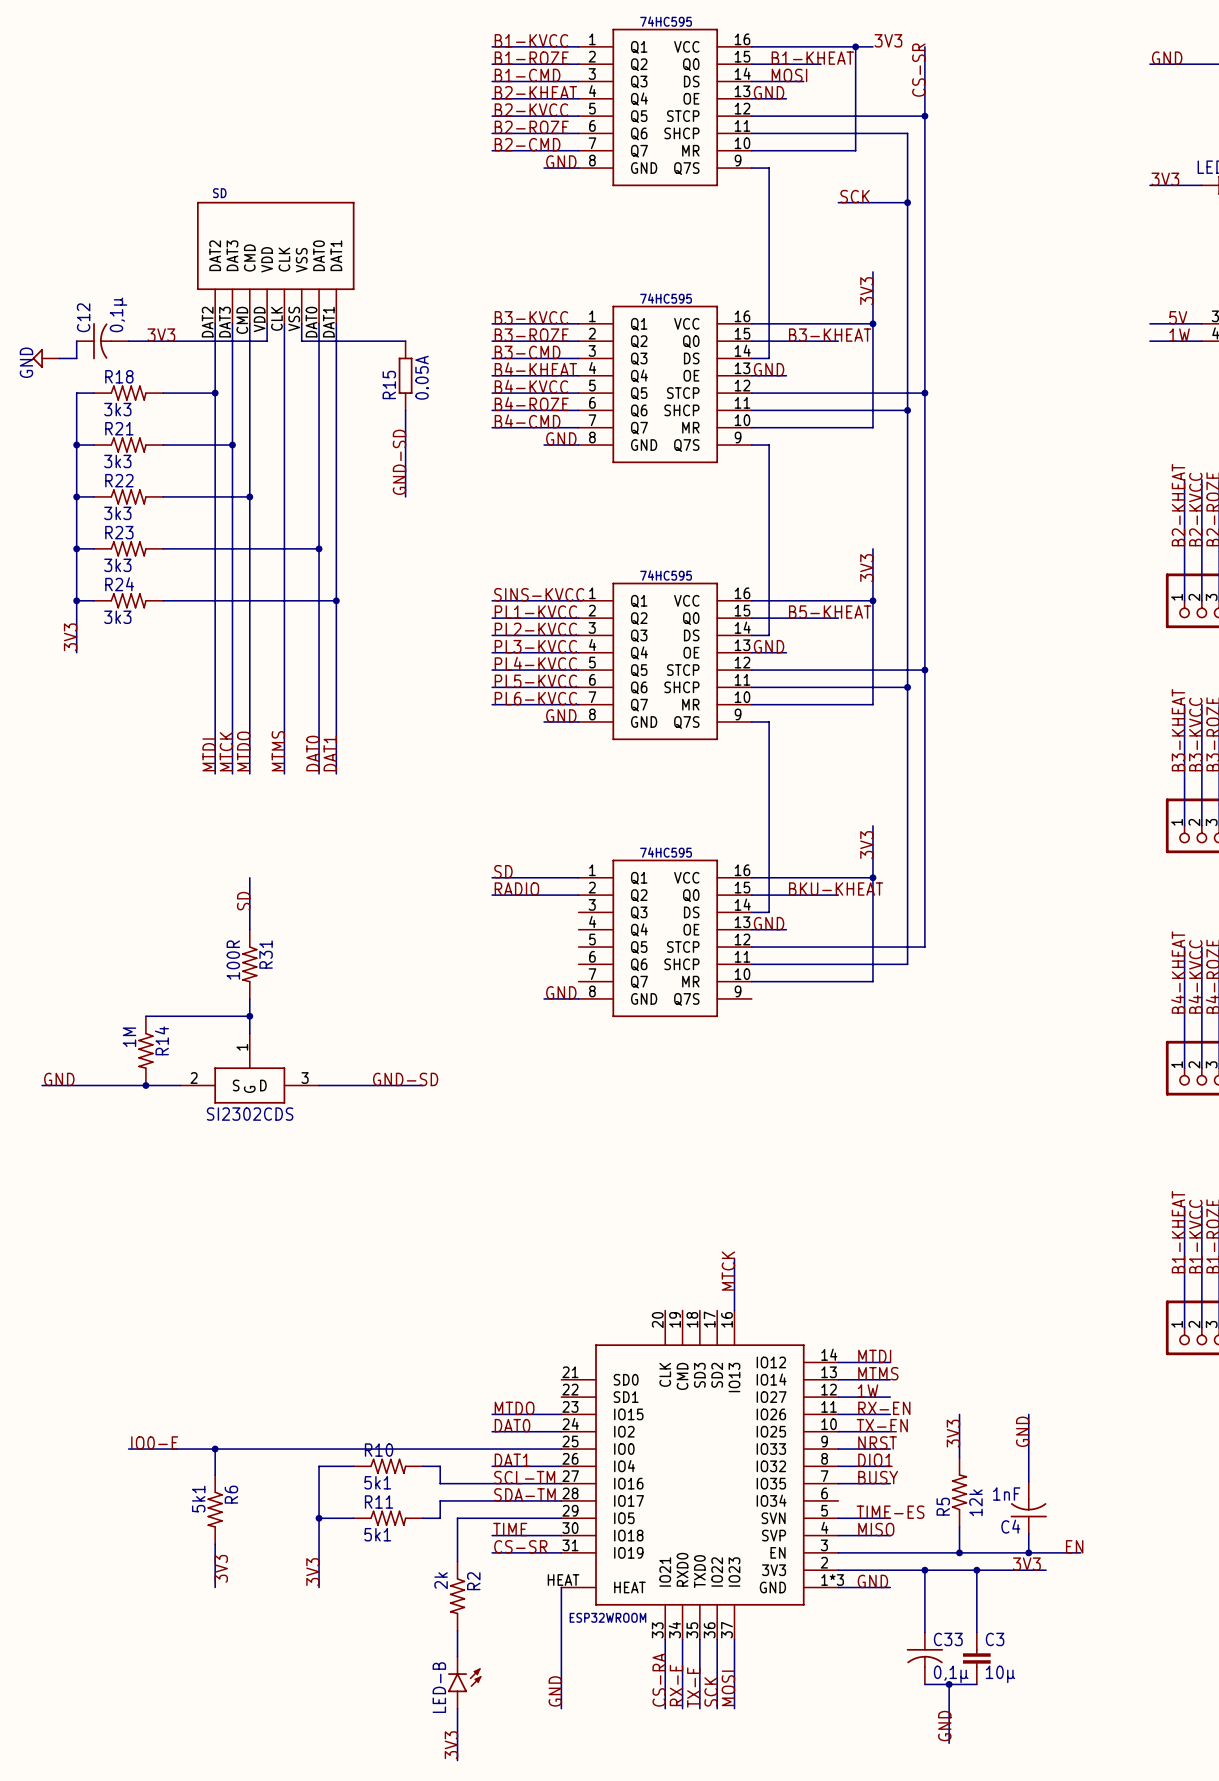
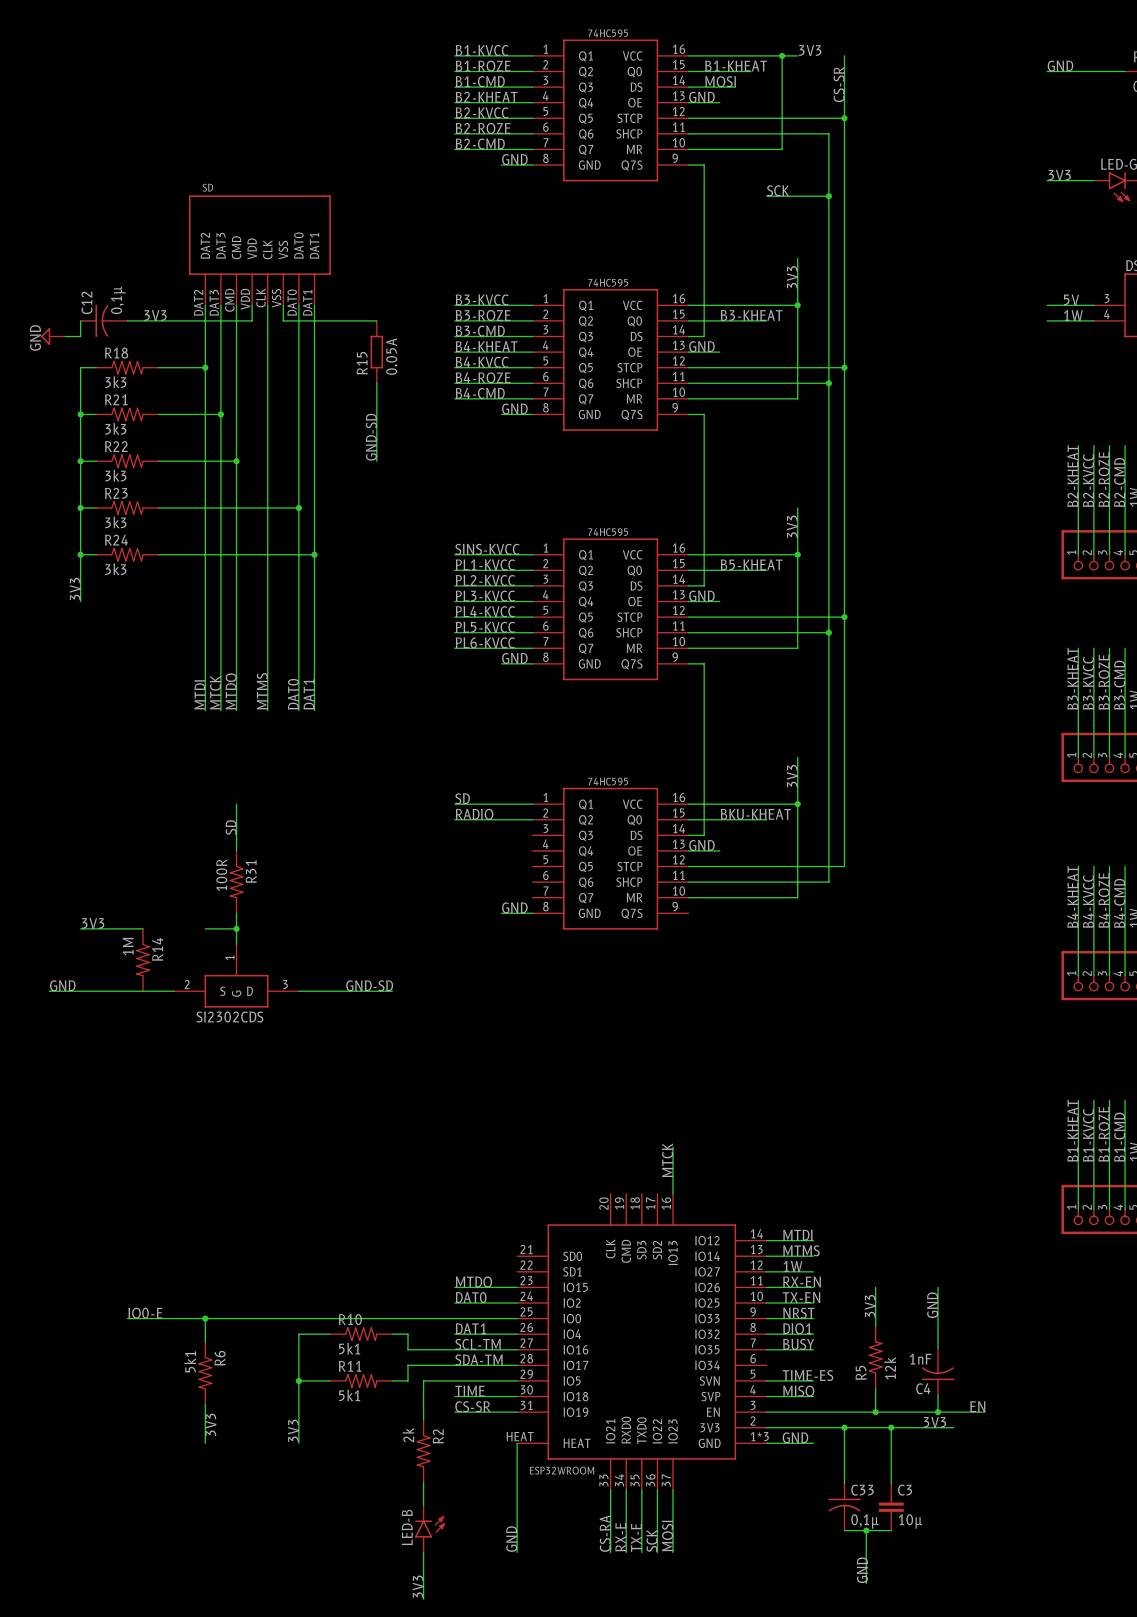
label: none -> 3V3 (93, 923)
wire: (145, 1016) (215, 1016) -> (142, 928) (80, 928)
junction: (145, 1085) -> none

